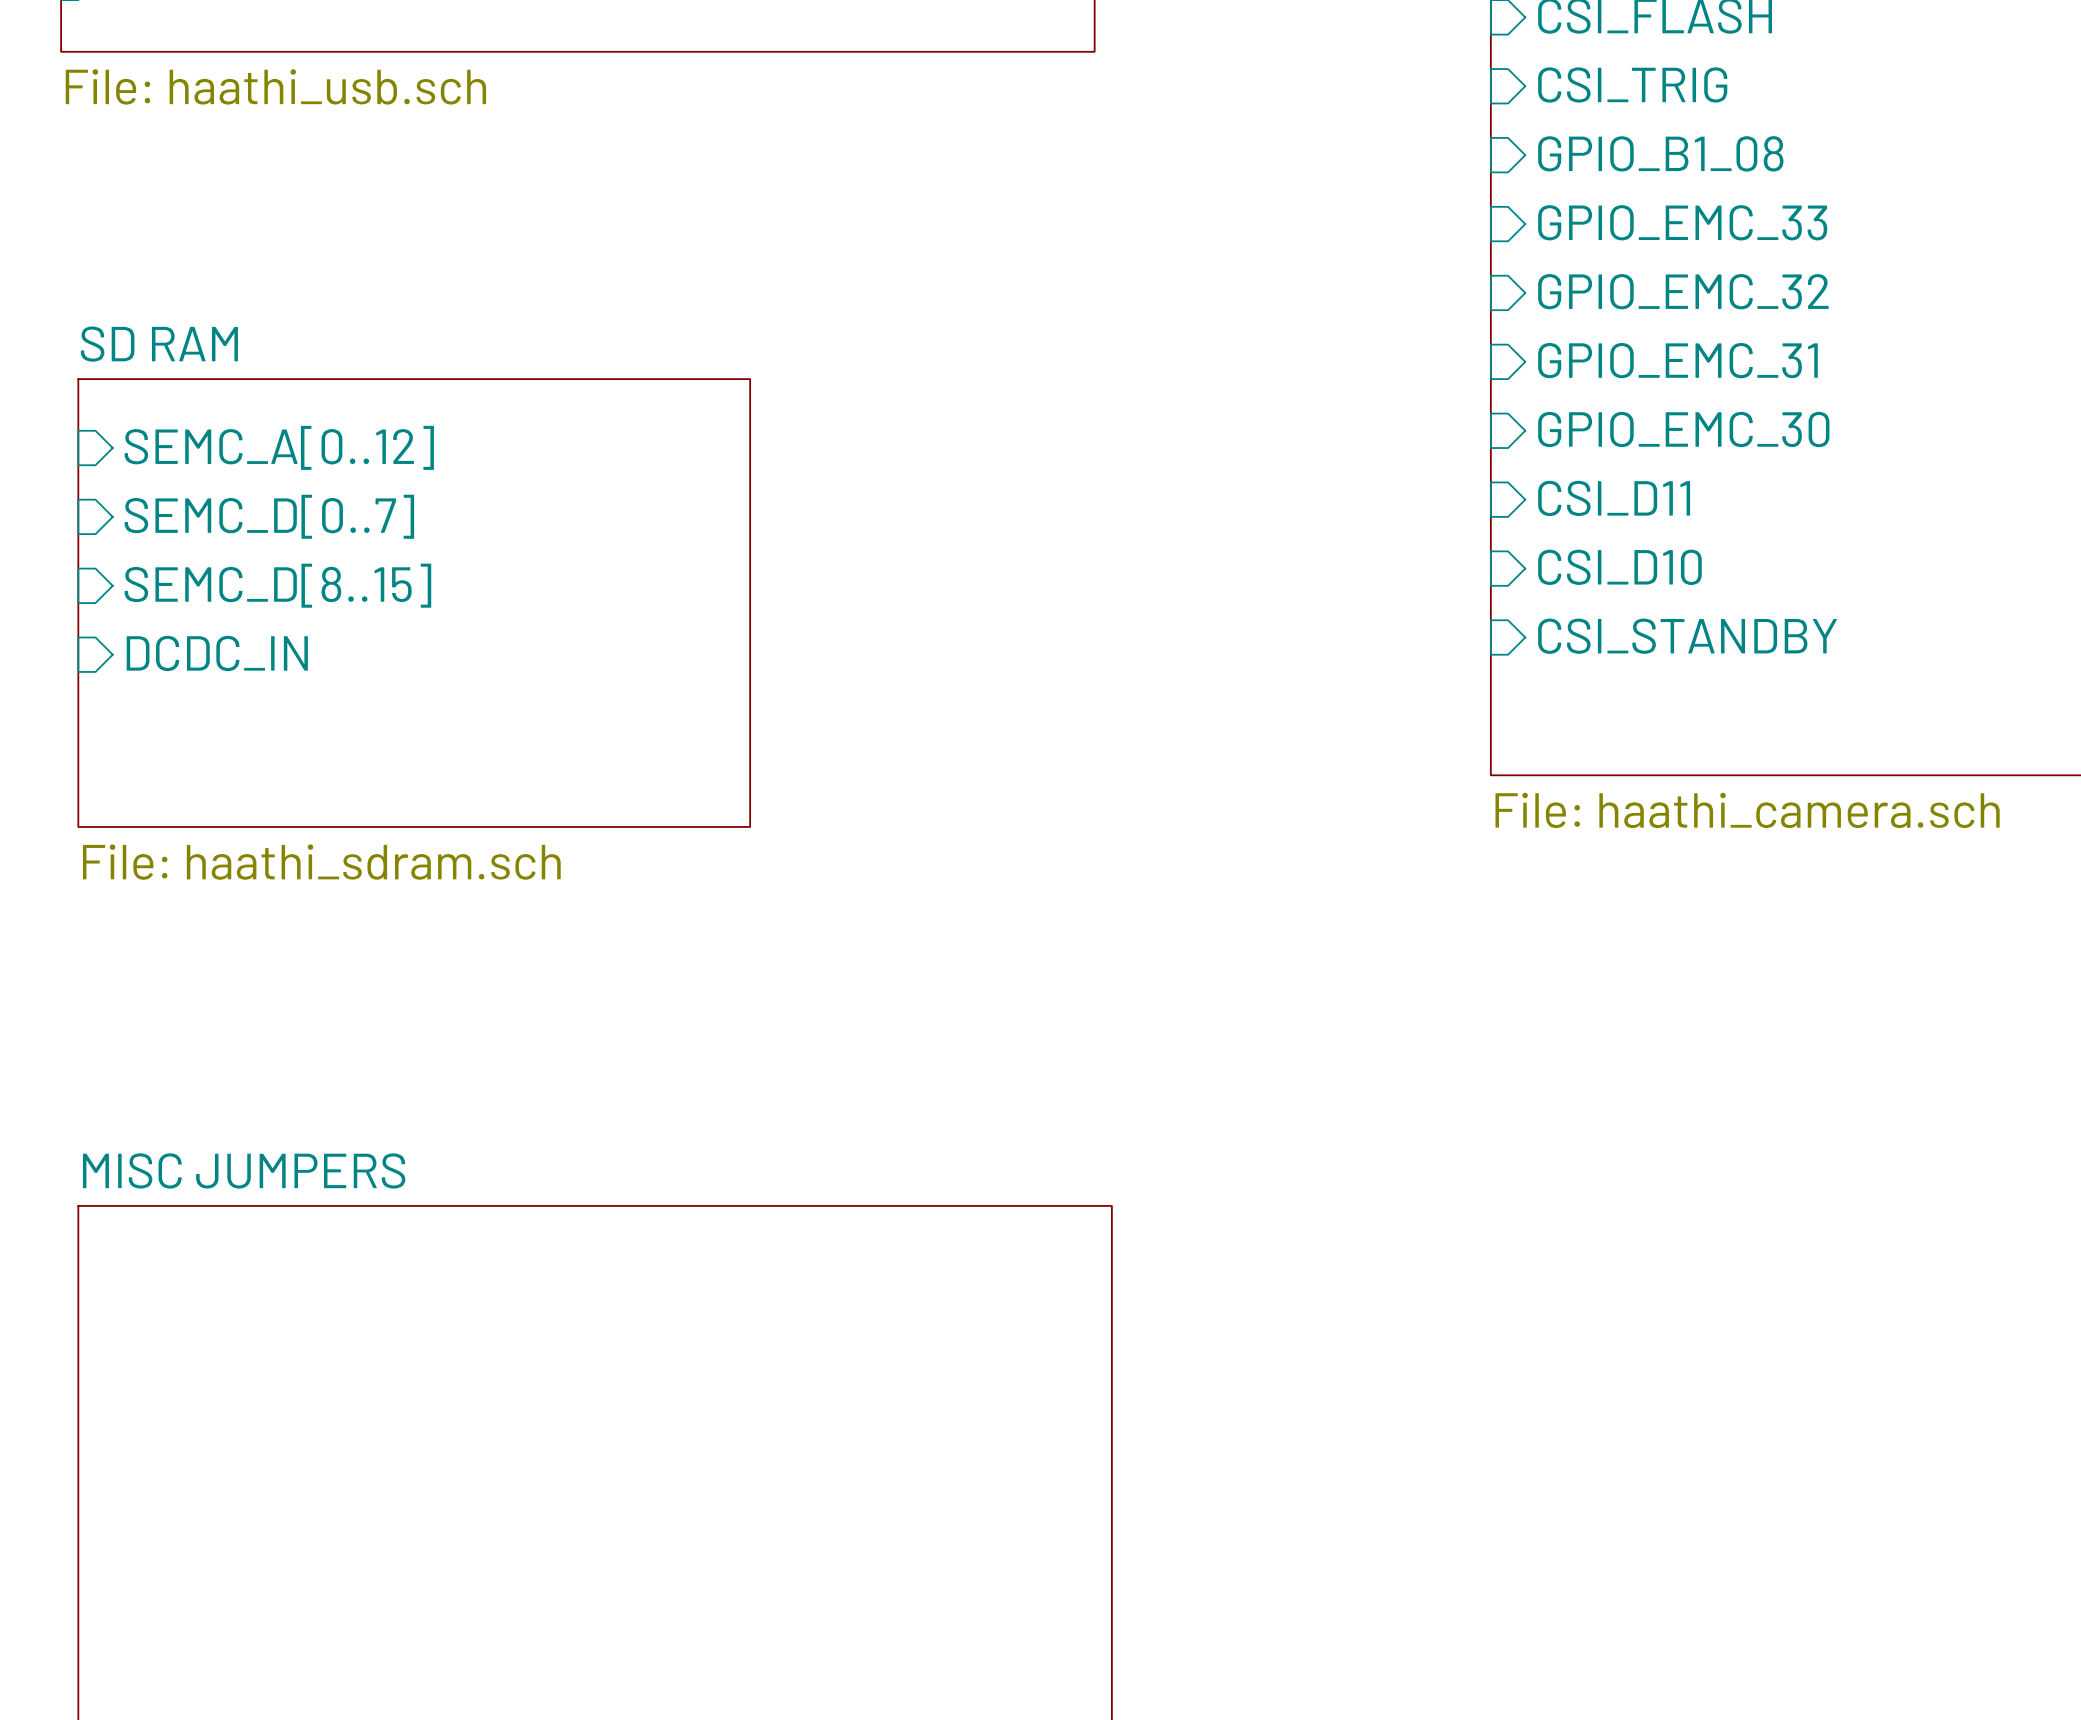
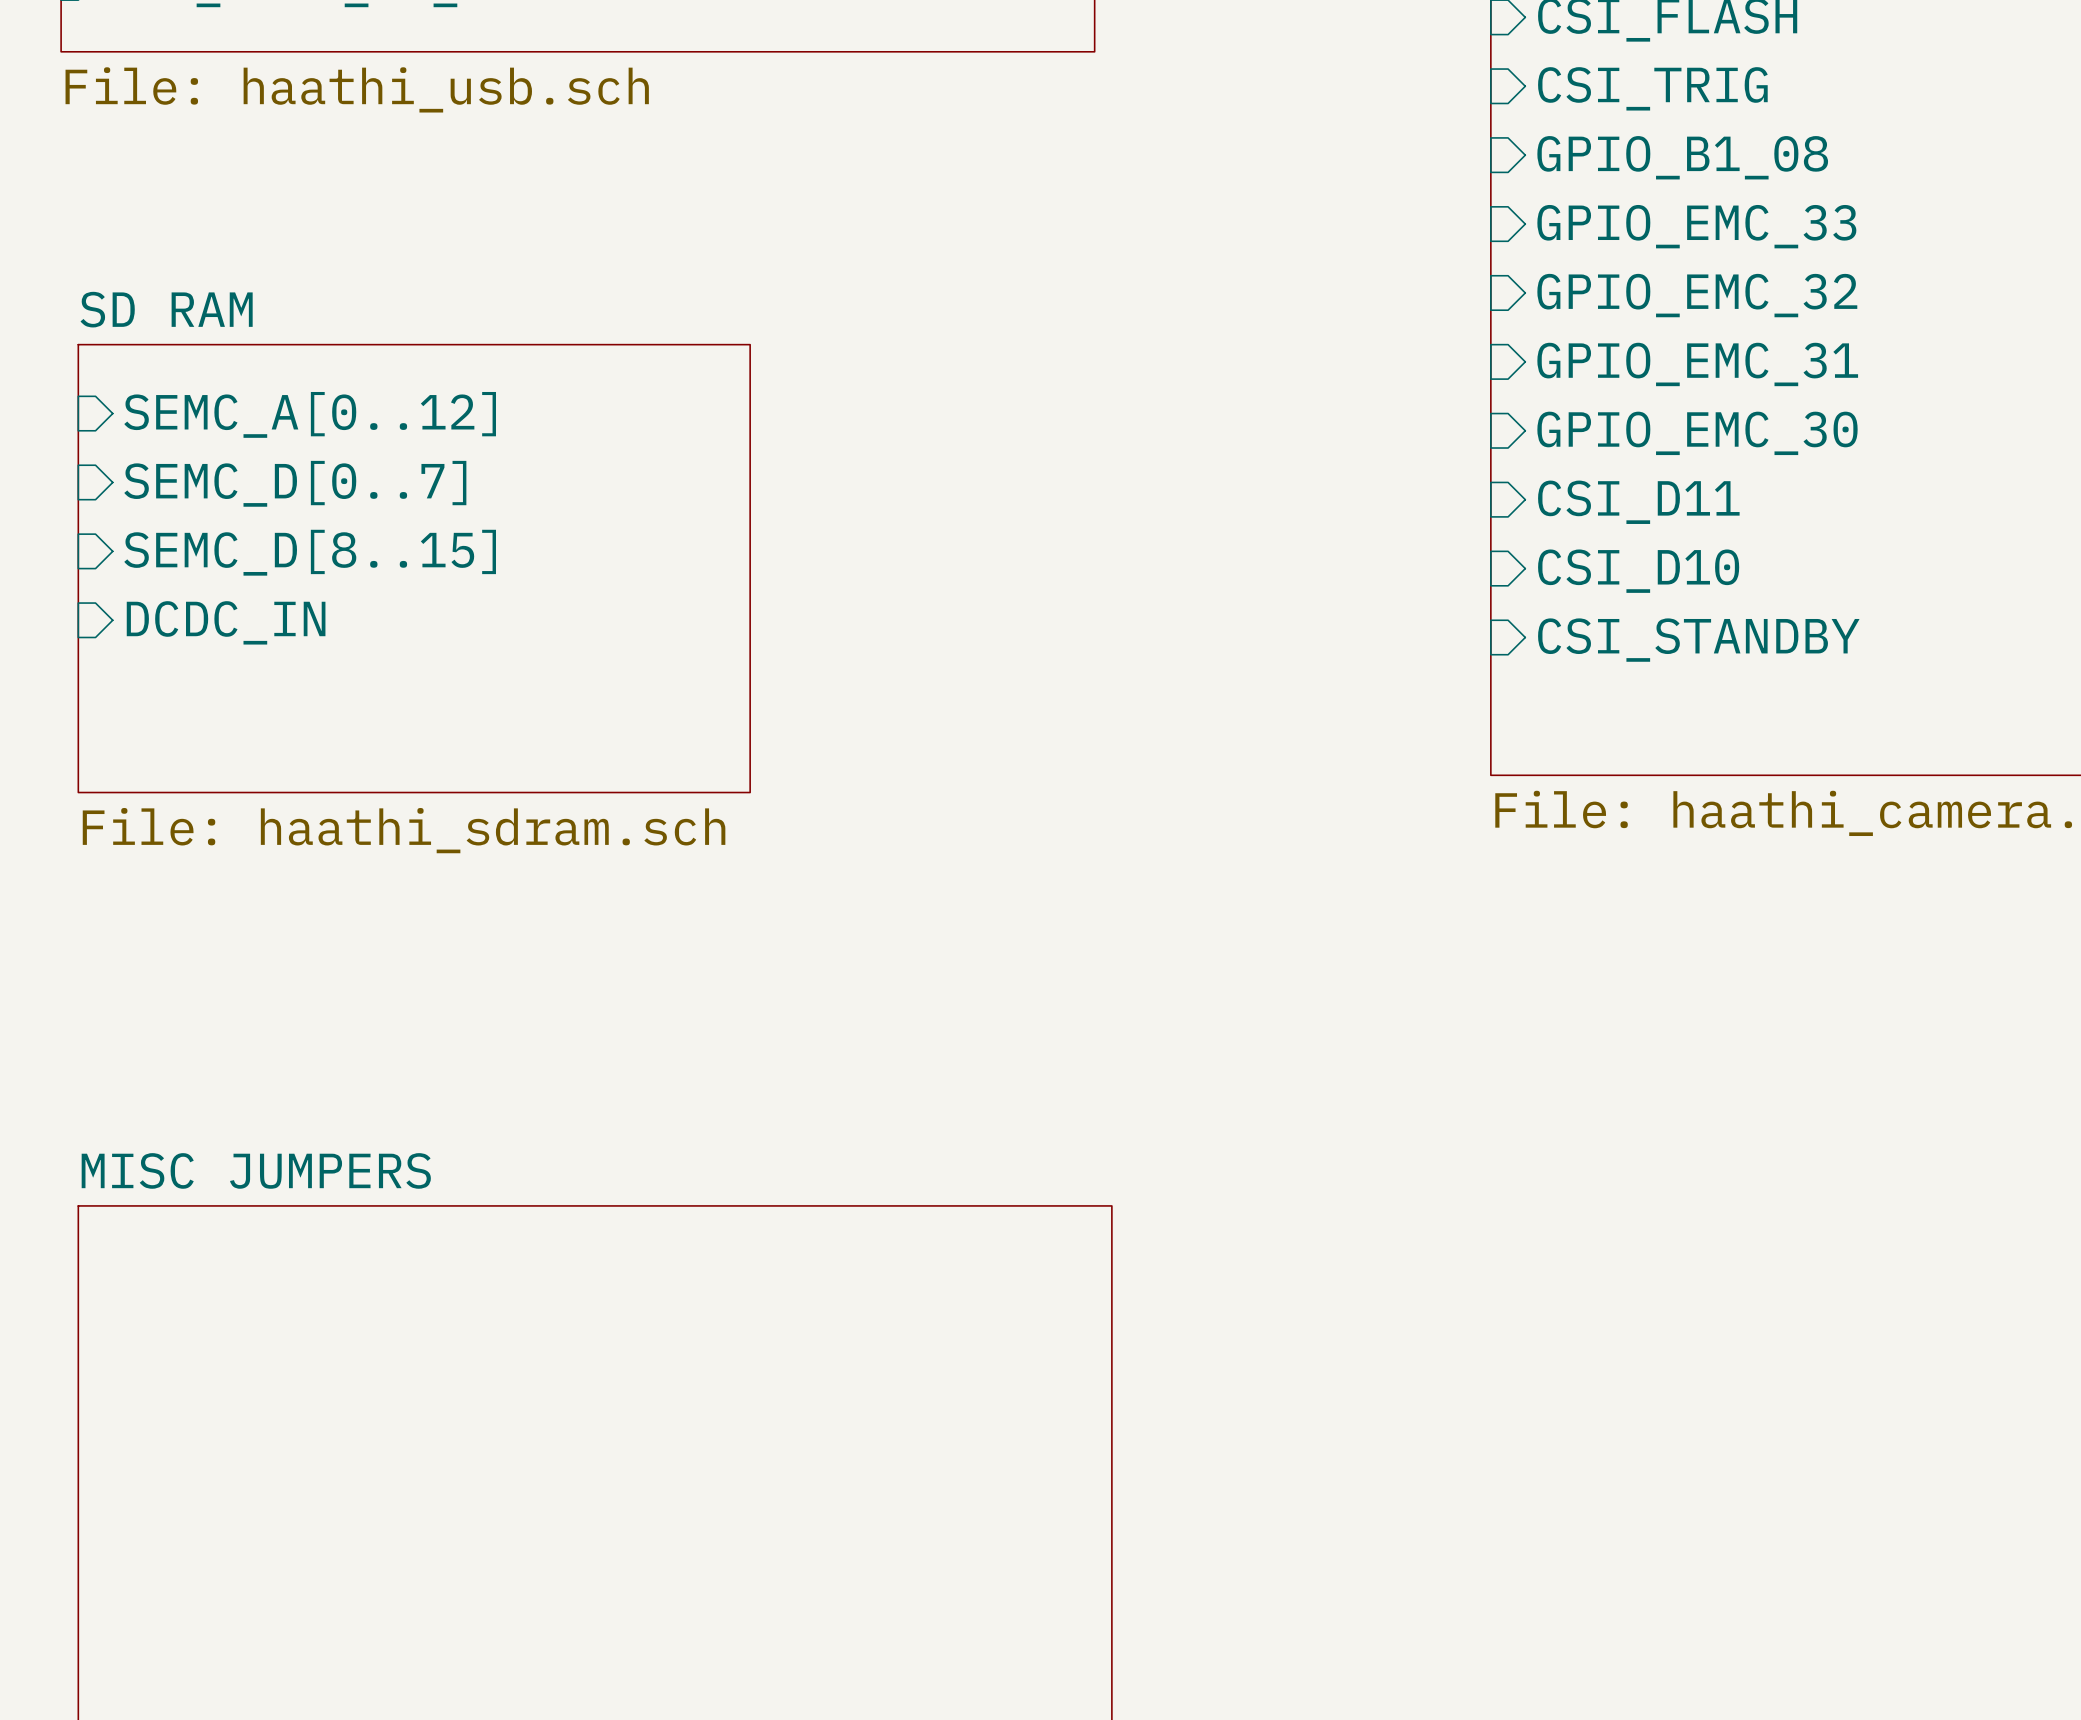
sheet pin position: SEMC_A[0..12] (279, 447) -> SEMC_A[0..12] (310, 414)
sheet pin position: SEMC_D[0..7] (269, 516) -> SEMC_D[0..7] (295, 483)
sheet pin position: SEMC_D[8..15] (277, 585) -> SEMC_D[8..15] (310, 552)
sheet SD RAM position: (414, 603) -> (414, 568)
sheet pin position: DCDC_IN (217, 653) -> DCDC_IN (226, 622)

